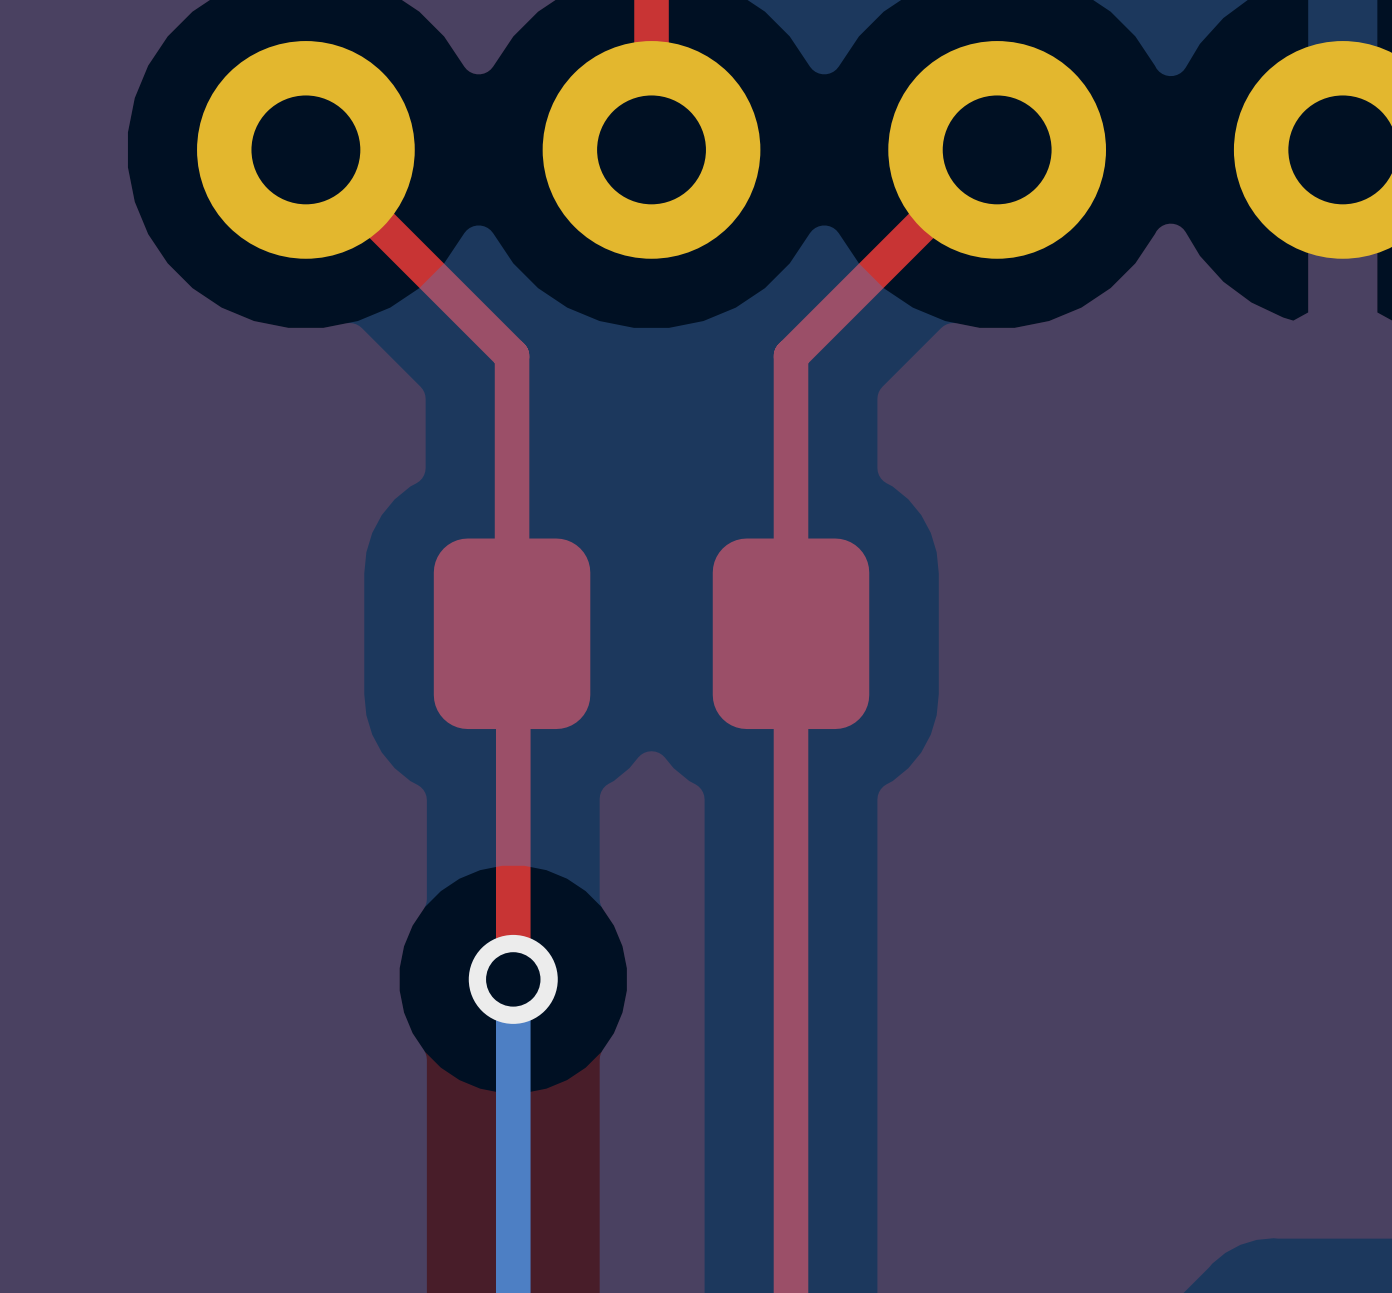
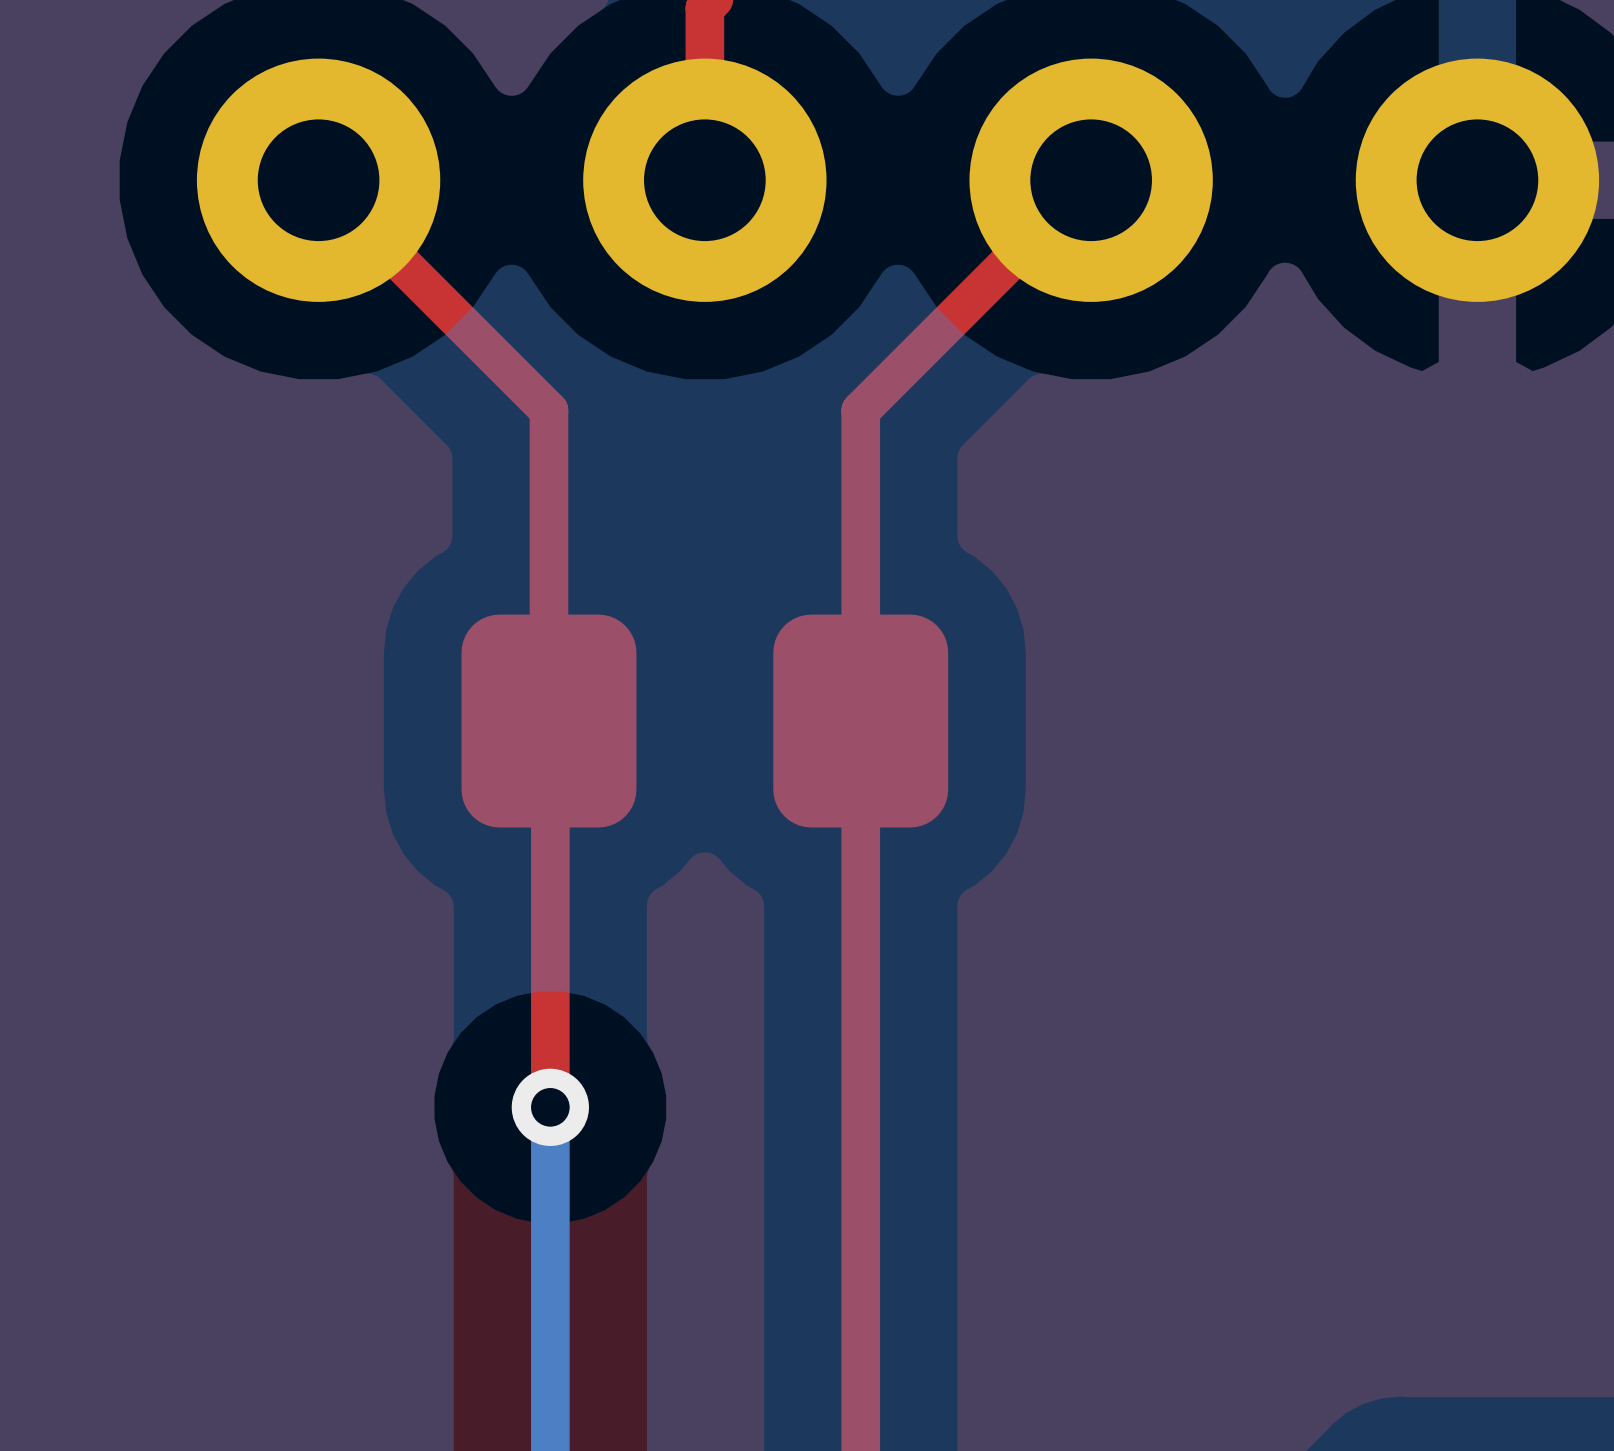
via size: [468, 934, 558, 1024] -> [511, 1068, 589, 1146]

